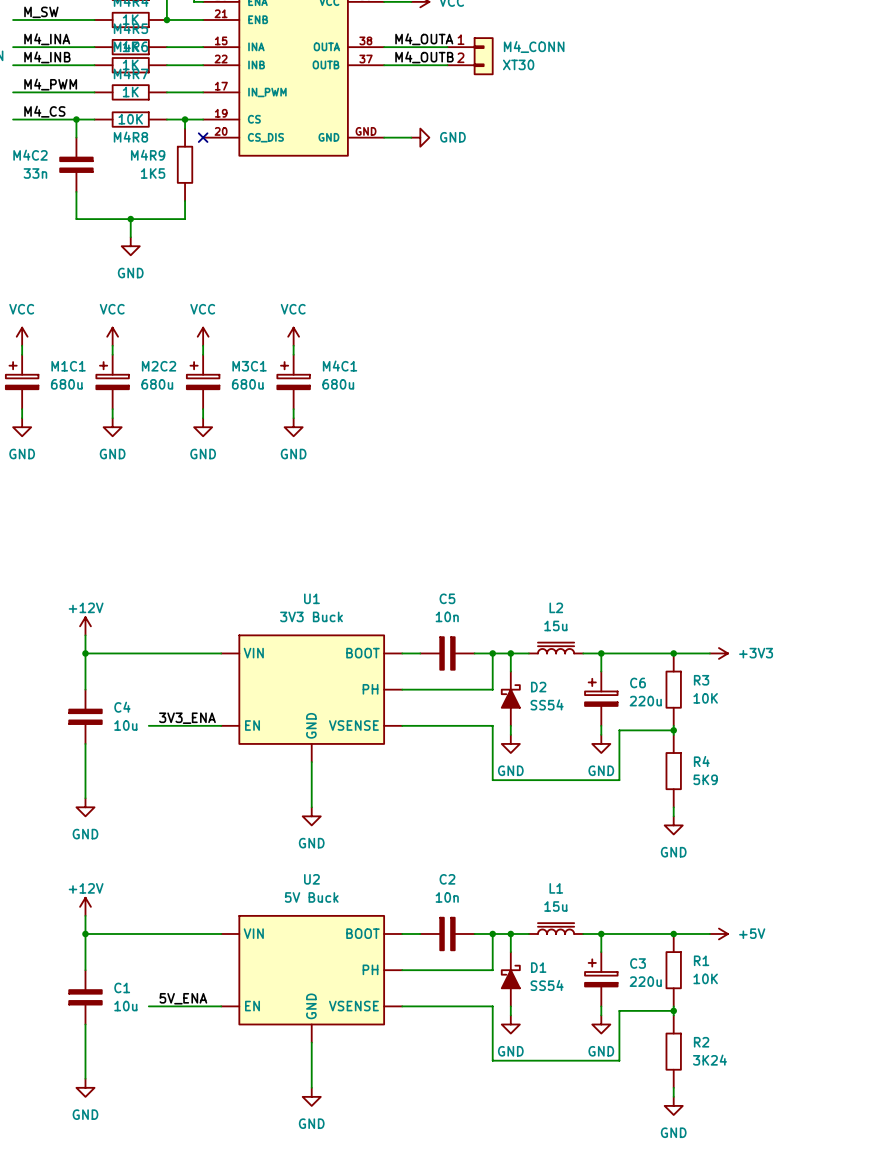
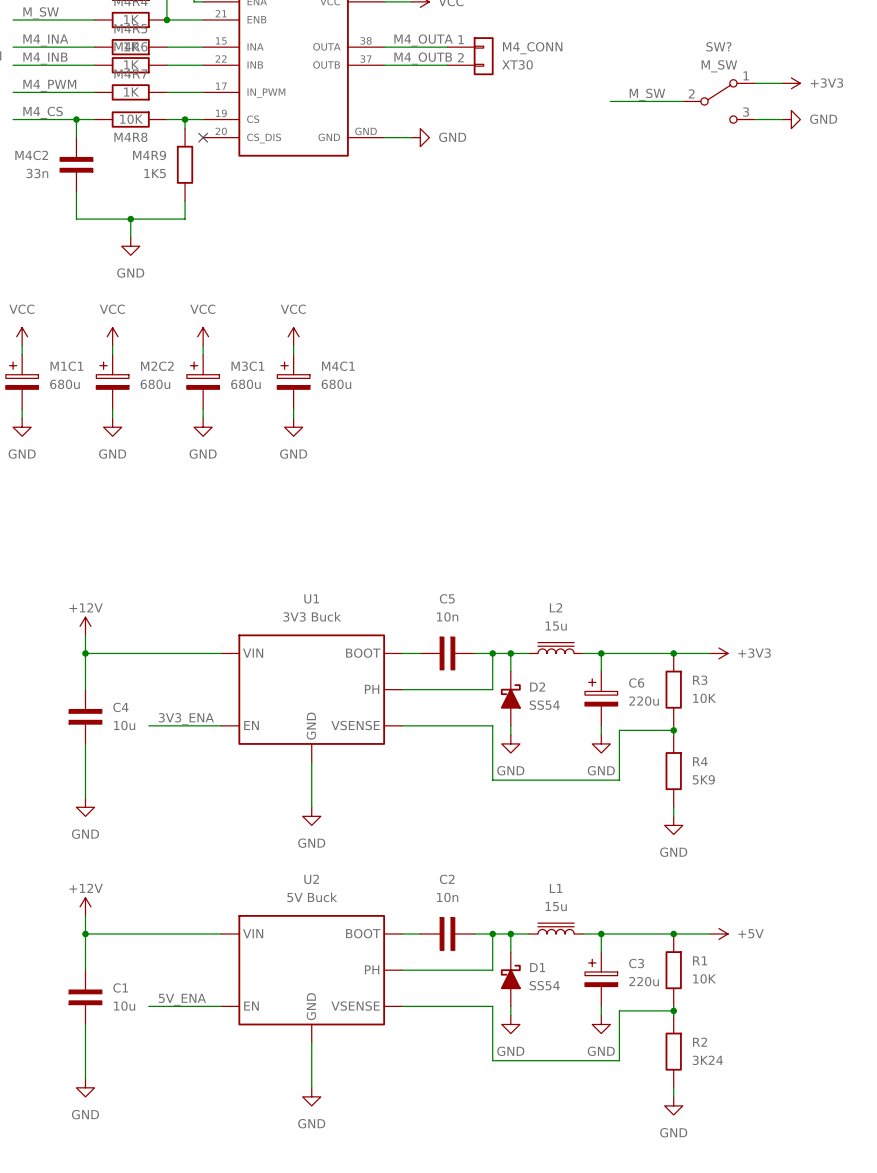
wire: none -> (755, 83) (782, 83)
power symbol: none -> +3V3 (791, 83)
label: none -> M_SW (647, 94)
wire: none -> (610, 101) (682, 101)
SW?: none -> M_SW (718, 101)
wire: none -> (755, 119) (782, 119)
power symbol: none -> GND (791, 119)

